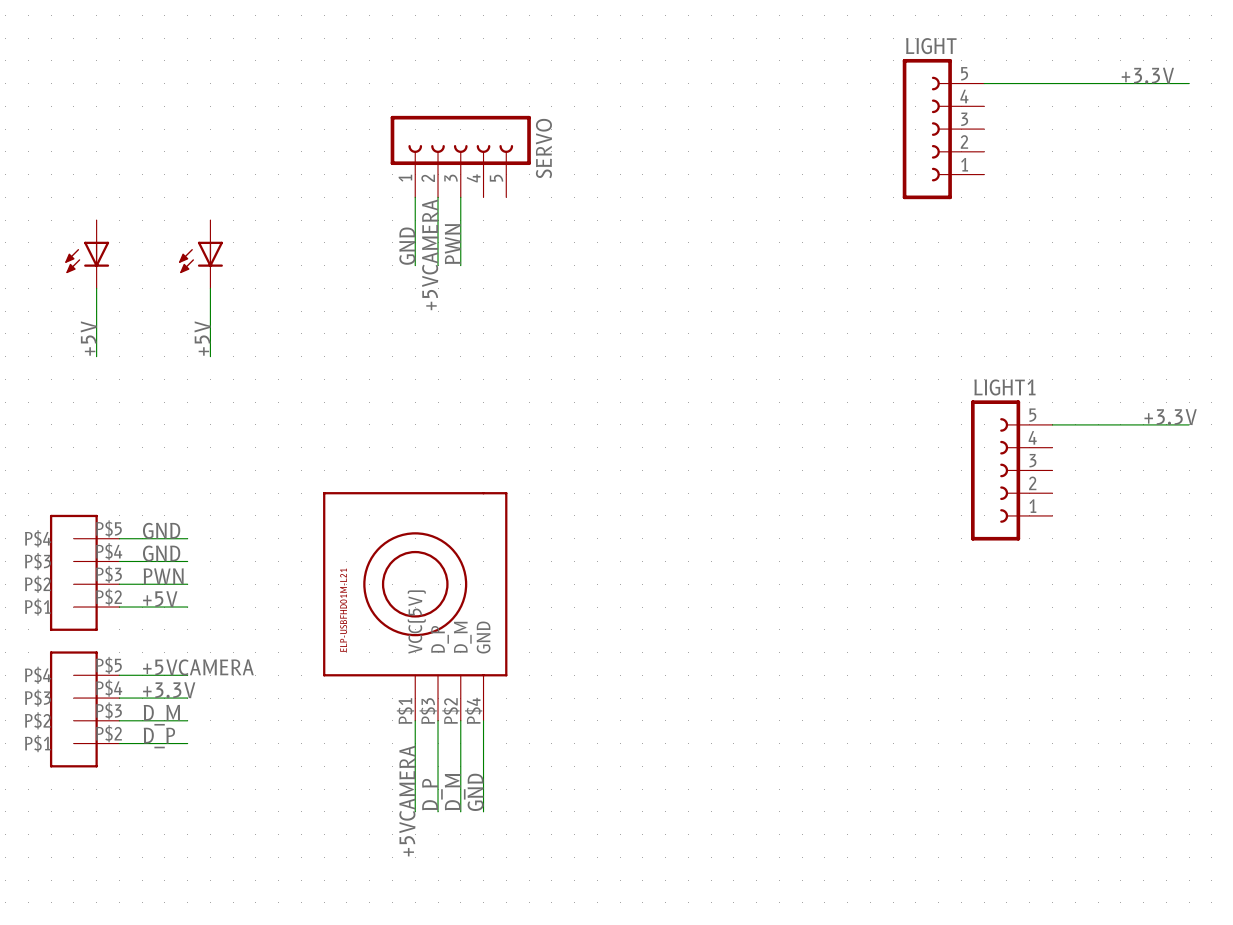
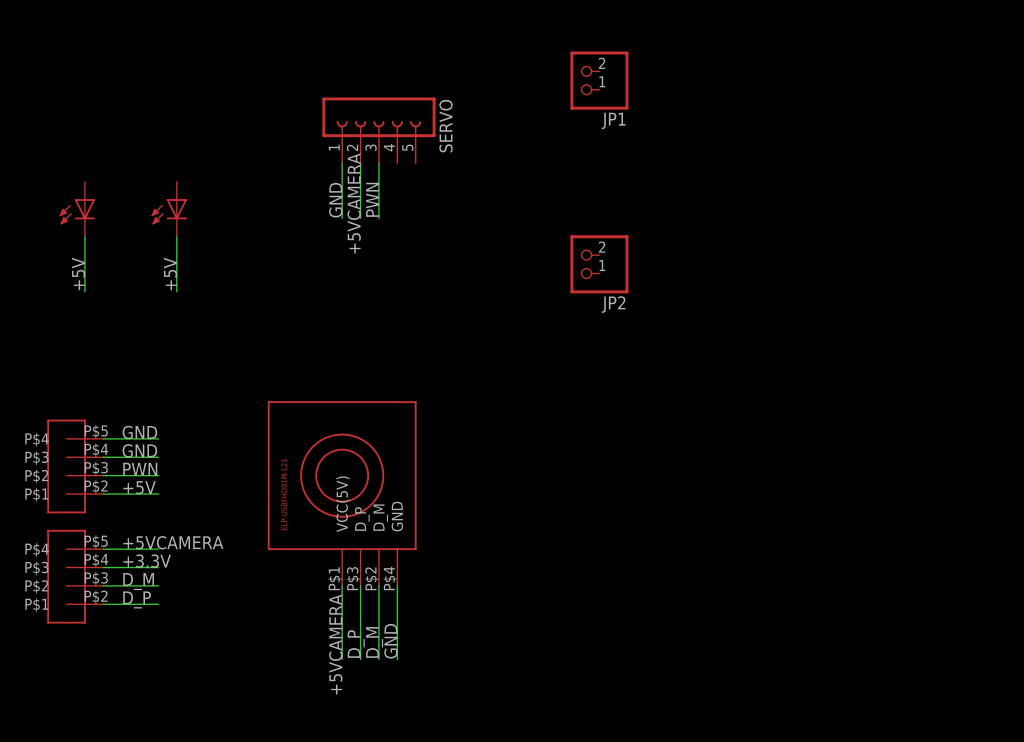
label: +3.3V (1147, 75) -> none
wire: (984, 83) (1189, 83) -> none
JP1: none -> (599, 80)
LIGHT: (943, 129) -> none
JP2: none -> (599, 264)
label: +3.3V (1170, 417) -> none
wire: (1052, 424) (1189, 424) -> none
LIGHT1: (1011, 470) -> none

